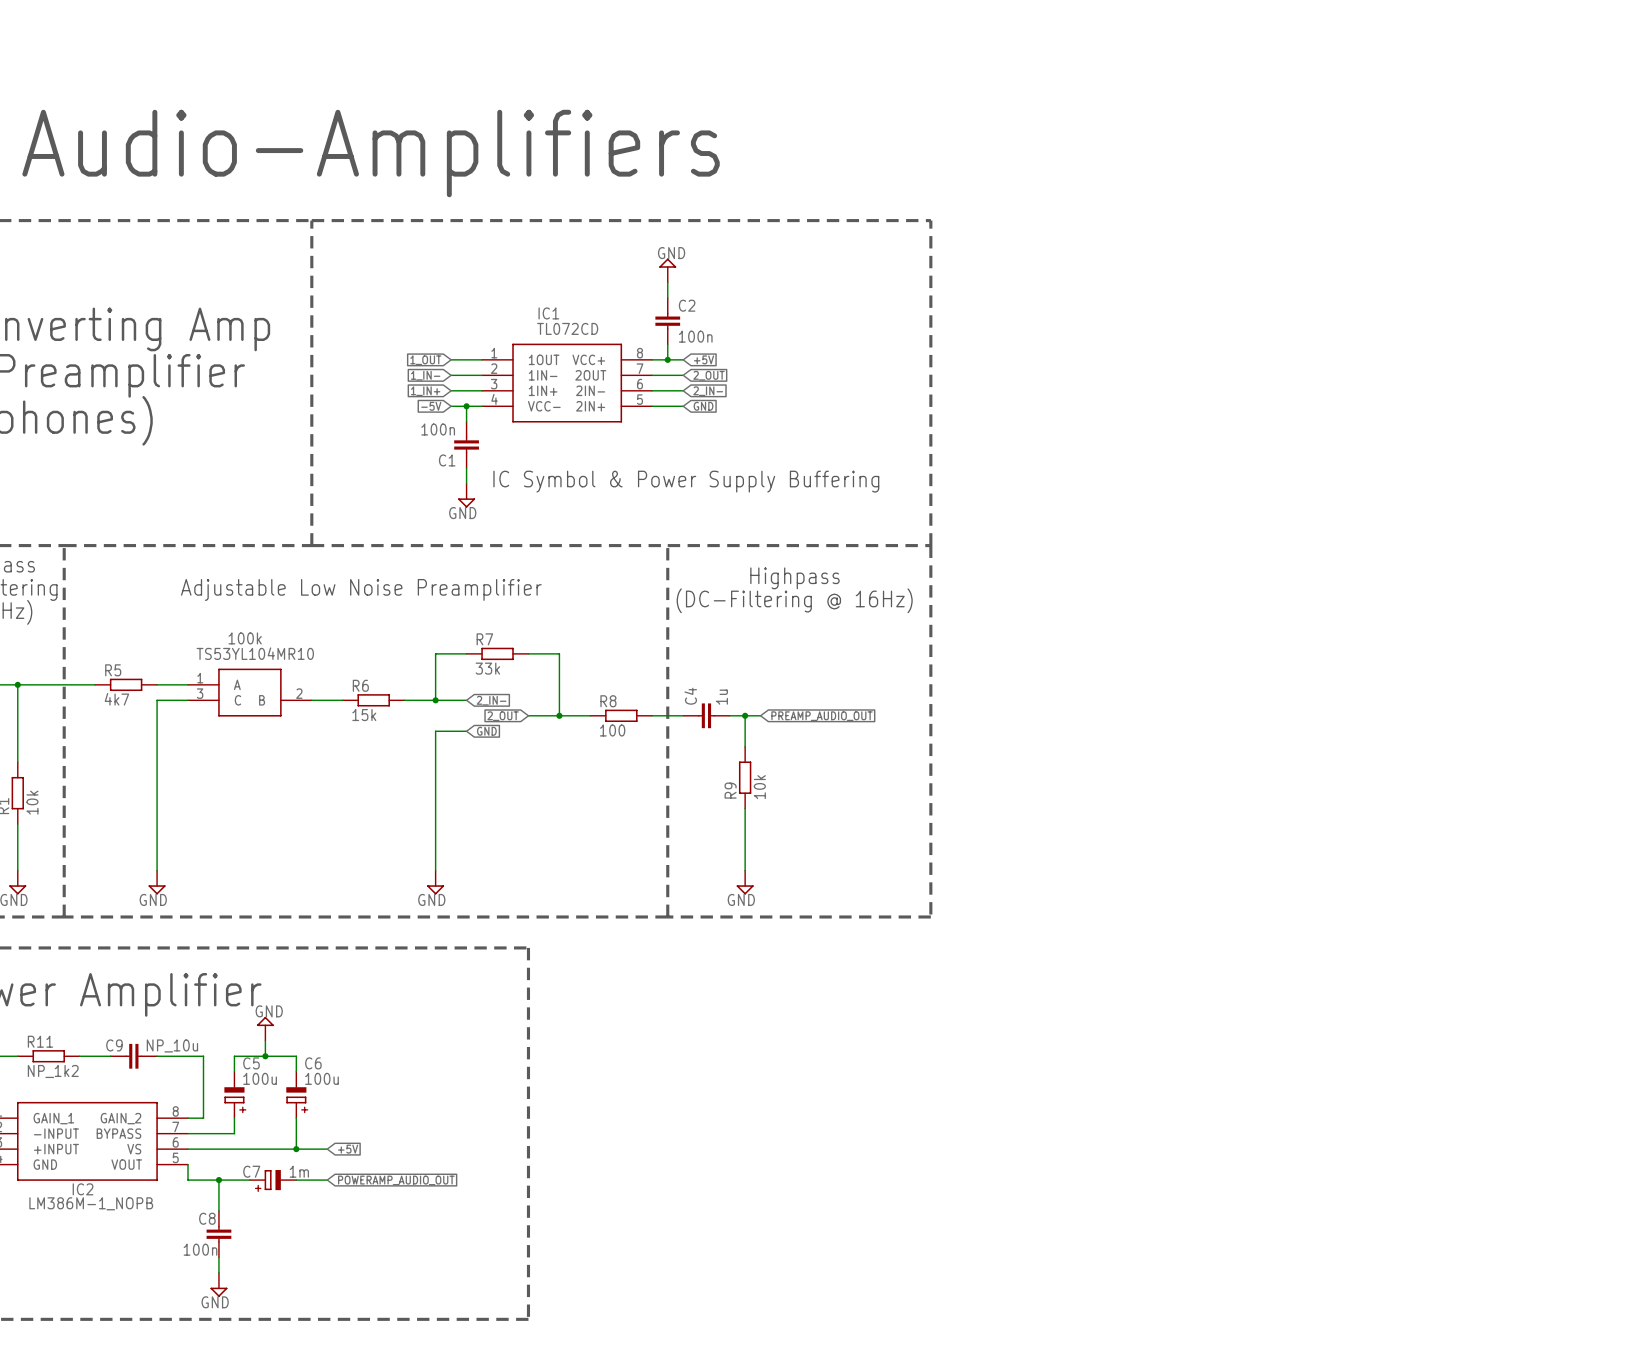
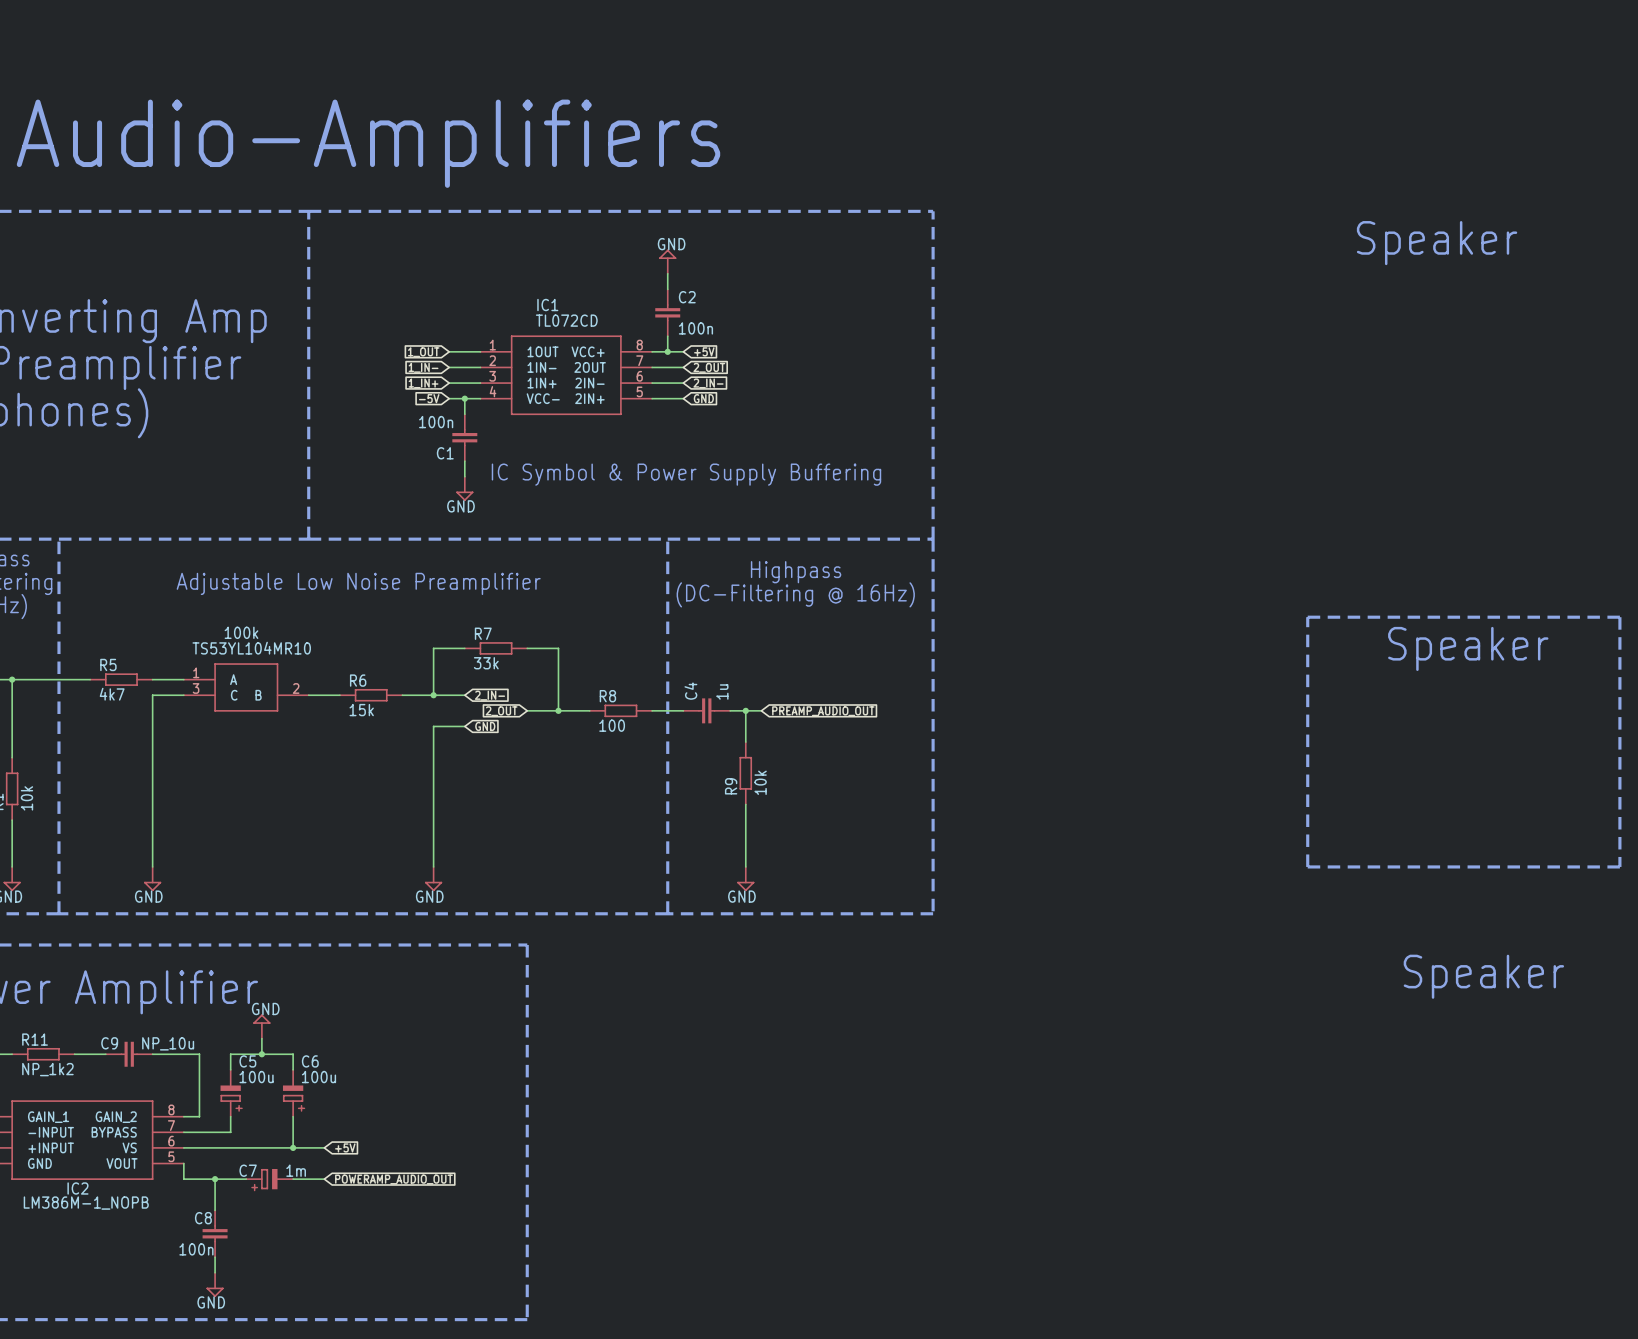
text: none -> Speaker (1437, 243)
line: none -> (1307, 617) (1619, 617) (1619, 866) (1307, 866) (1307, 617)
text: none -> Speaker (1468, 648)
text: none -> Speaker (1483, 976)

